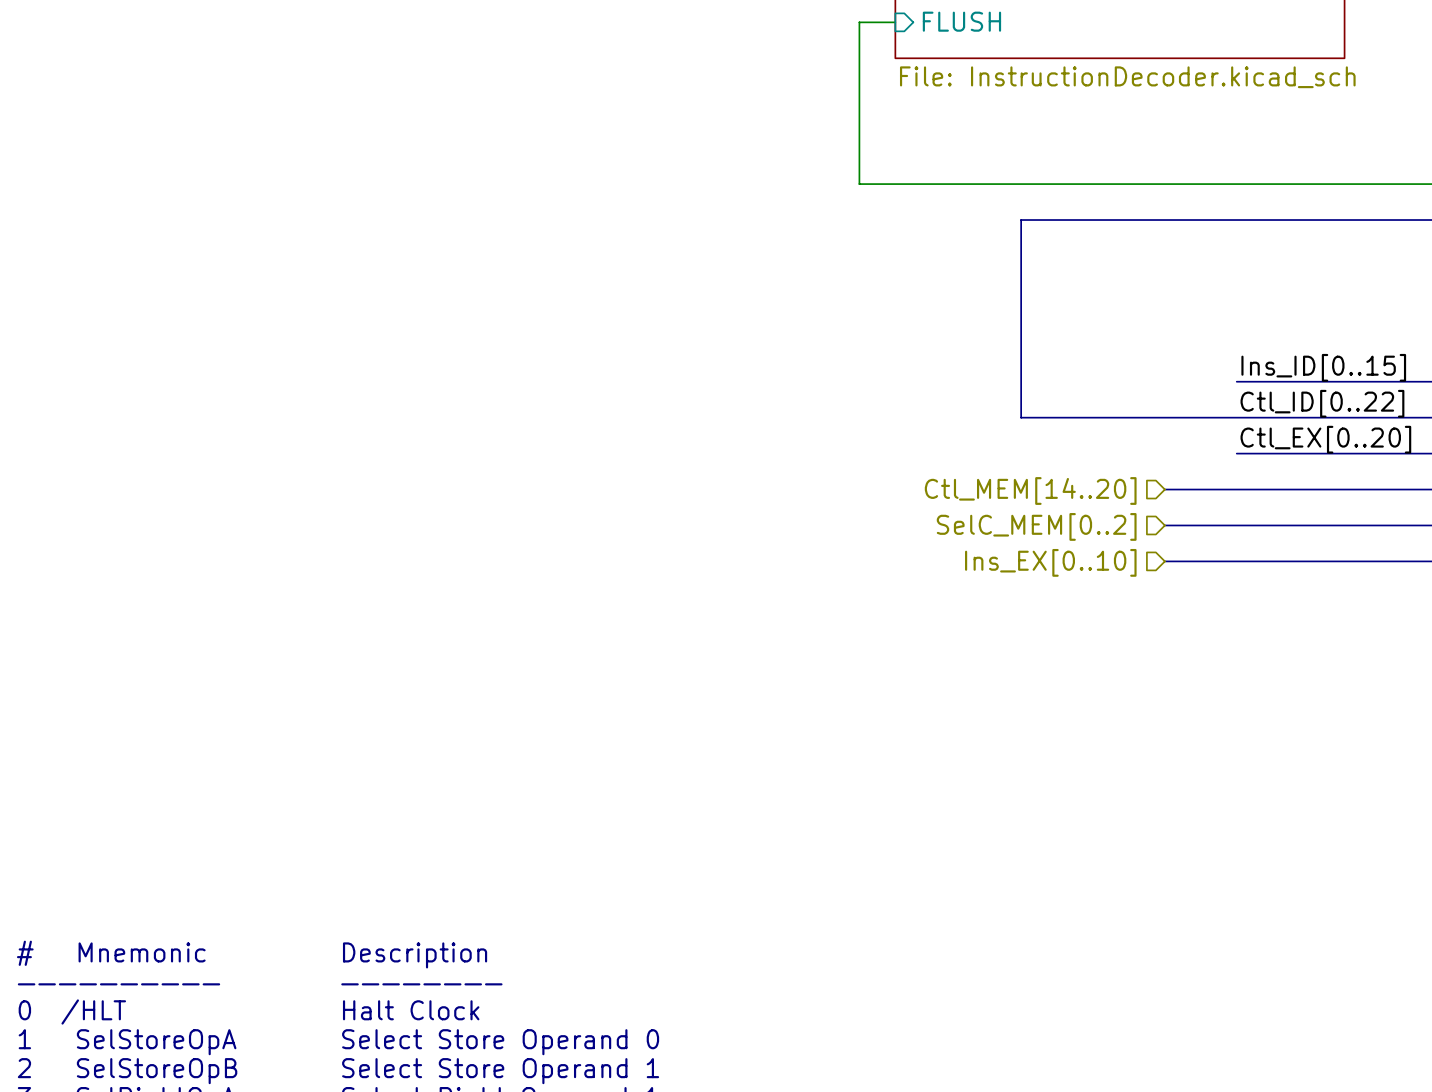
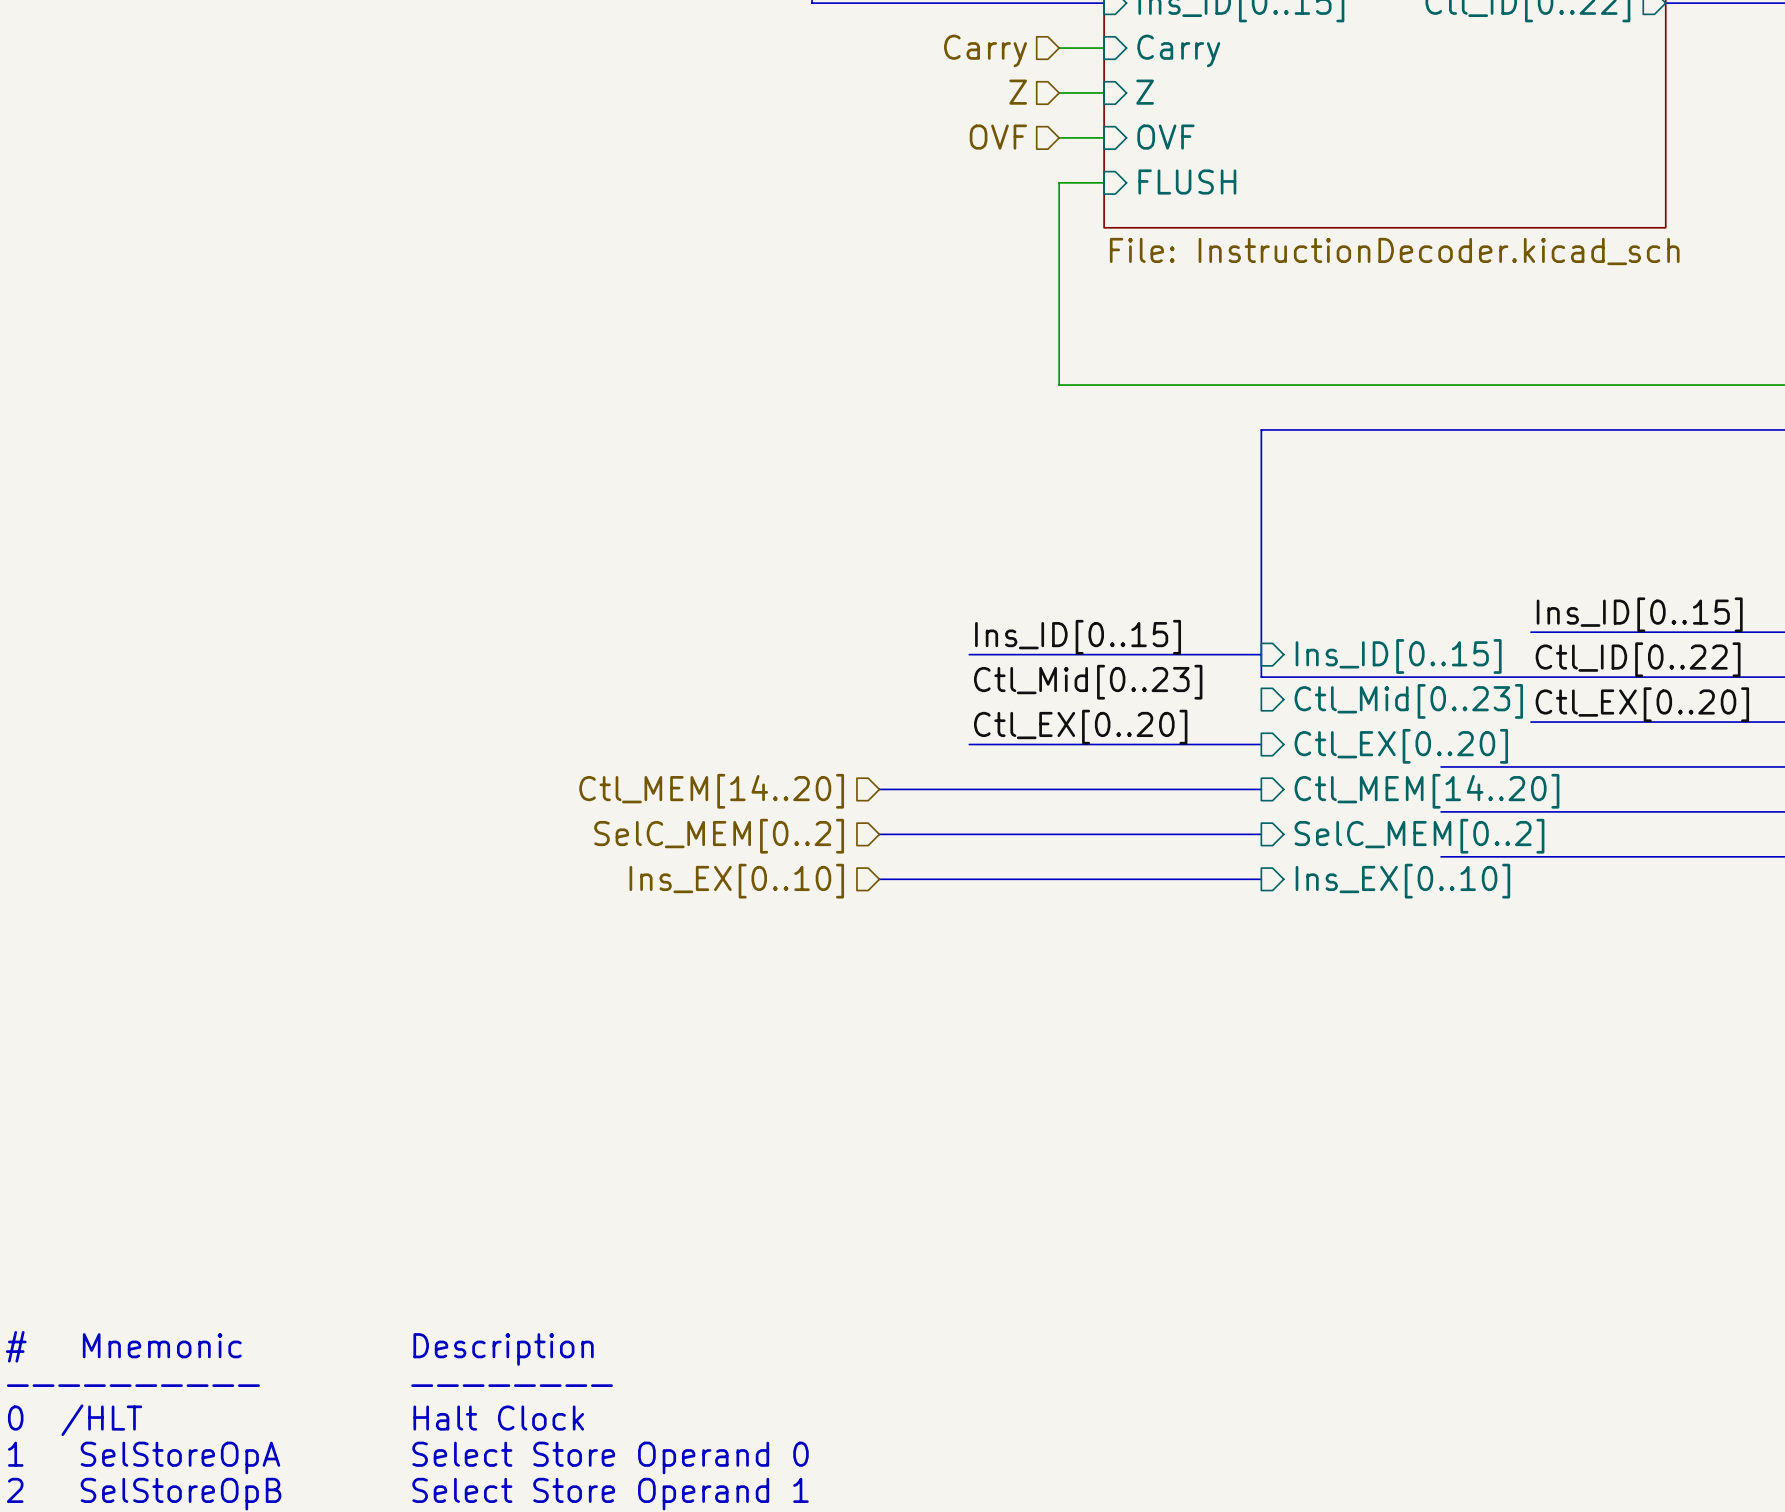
label: none -> Ins_ID[0..15] (1078, 637)
bus: none -> (969, 654) (1261, 654)
sheet pin: none -> Ins_ID[0..15] (1398, 656)
label: none -> Ctl_Mid[0..23] (1088, 682)
sheet pin: none -> Ctl_Mid[0..23] (1408, 701)
label: none -> Ctl_EX[0..20] (1080, 727)
bus: none -> (969, 744) (1261, 744)
sheet pin: none -> Ctl_EX[0..20] (1401, 746)
hierarchical label: Ctl_MEM[14..20] (1030, 491) -> none
bus: none -> (879, 789) (1261, 789)
hierarchical label: none -> Ctl_MEM[14..20] (711, 791)
sheet pin: none -> Ctl_MEM[14..20] (1426, 791)
hierarchical label: SelC_MEM[0..2] (1036, 526) -> none
bus: none -> (879, 834) (1261, 834)
hierarchical label: none -> SelC_MEM[0..2] (719, 836)
sheet pin: none -> SelC_MEM[0..2] (1419, 836)
hierarchical label: Ins_EX[0..10] (1050, 562) -> none
bus: none -> (879, 879) (1261, 879)
hierarchical label: none -> Ins_EX[0..10] (736, 881)
sheet pin: none -> Ins_EX[0..10] (1402, 881)

